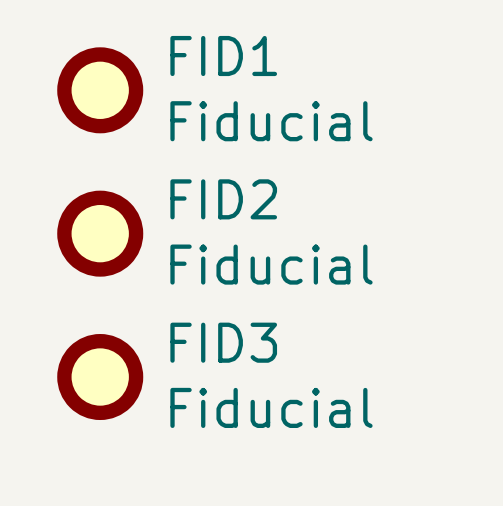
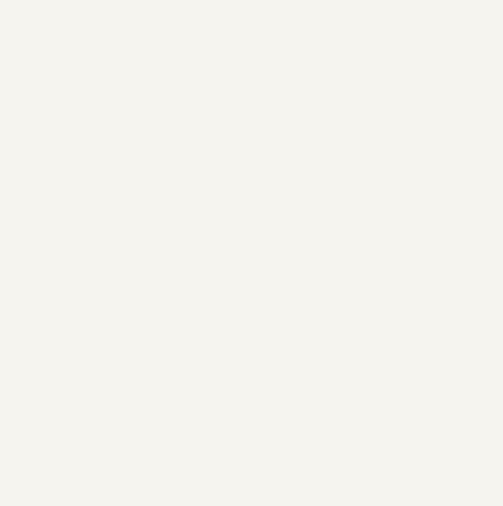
FID1: Fiducial (100, 90) -> none
FID2: Fiducial (100, 233) -> none
FID3: Fiducial (100, 377) -> none

